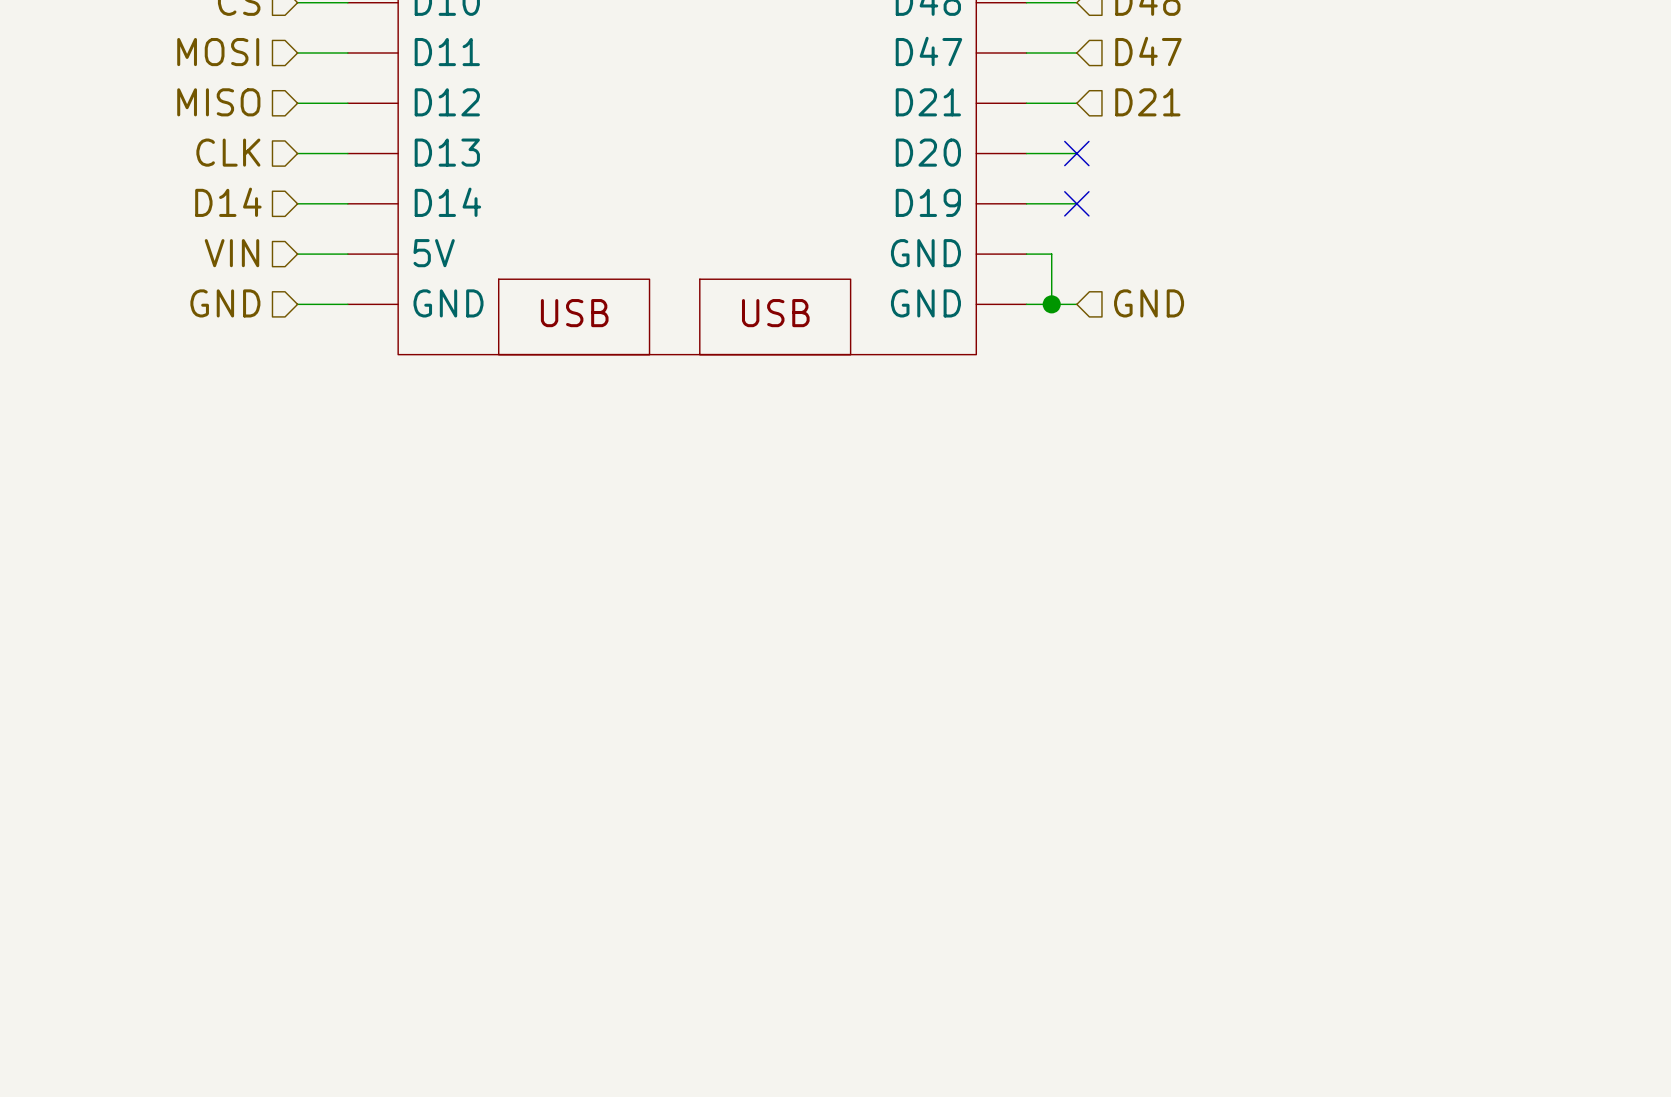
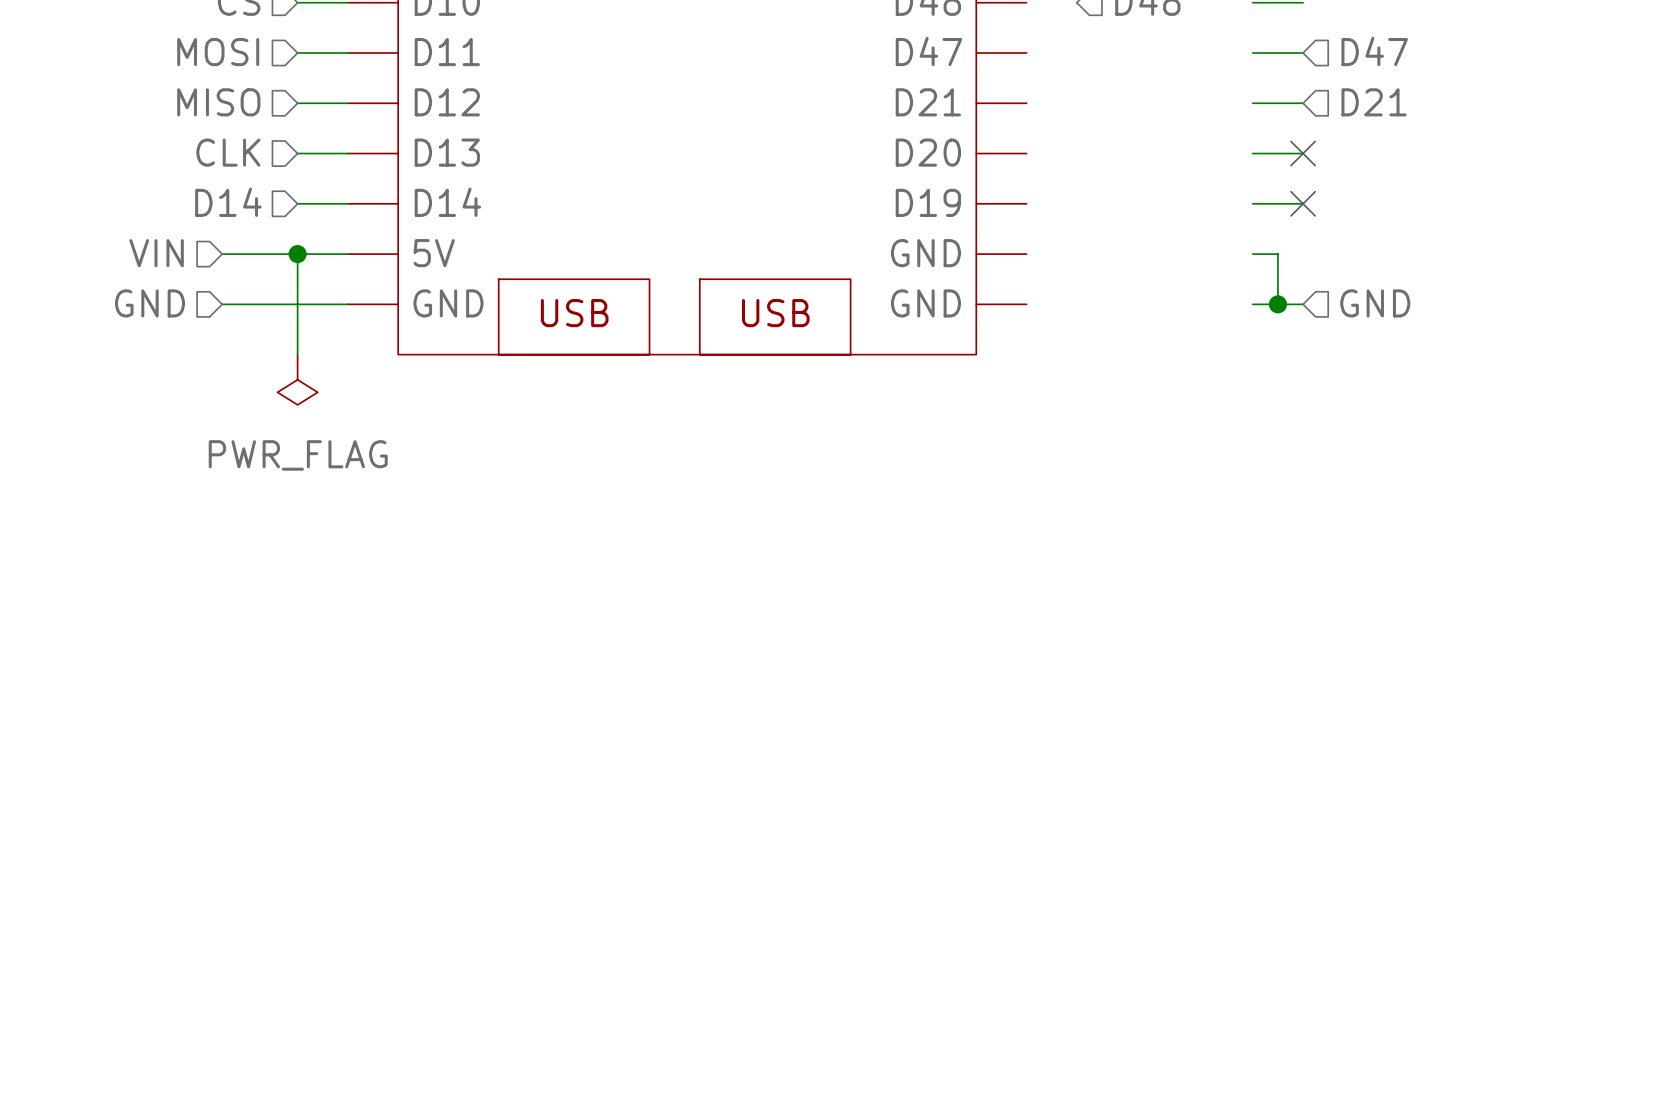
wire: (1026, 2) (1076, 2) -> (1252, 2) (1303, 2)
hierarchical label position: D47 (1148, 51) -> D47 (1374, 51)
wire: (1026, 52) (1076, 52) -> (1252, 52) (1303, 52)
hierarchical label position: D21 (1147, 102) -> D21 (1374, 102)
wire: (1026, 103) (1076, 103) -> (1252, 103) (1303, 103)
wire: (1026, 153) (1076, 153) -> (1252, 153) (1303, 153)
no-connect mark: (1076, 153) -> none
no-connect mark: none -> (1303, 153)
wire: (1026, 203) (1076, 203) -> (1252, 203) (1303, 203)
no-connect mark: (1076, 203) -> none
no-connect mark: none -> (1303, 203)
hierarchical label position: VIN (231, 253) -> VIN (156, 253)
wire: none -> (222, 254) (297, 254) (297, 354)
junction: none -> (297, 254)
wire: (1026, 254) (1051, 254) (1051, 304) -> (1252, 254) (1277, 254) (1277, 304)
hierarchical label position: GND (225, 303) -> GND (149, 303)
hierarchical label position: GND (1149, 303) -> GND (1375, 303)
wire: none -> (222, 304) (297, 304)
wire: (1026, 304) (1076, 304) -> (1252, 304) (1303, 304)
junction: (1051, 304) -> none
junction: none -> (1277, 304)
power symbol: none -> PWR_FLAG (297, 379)

